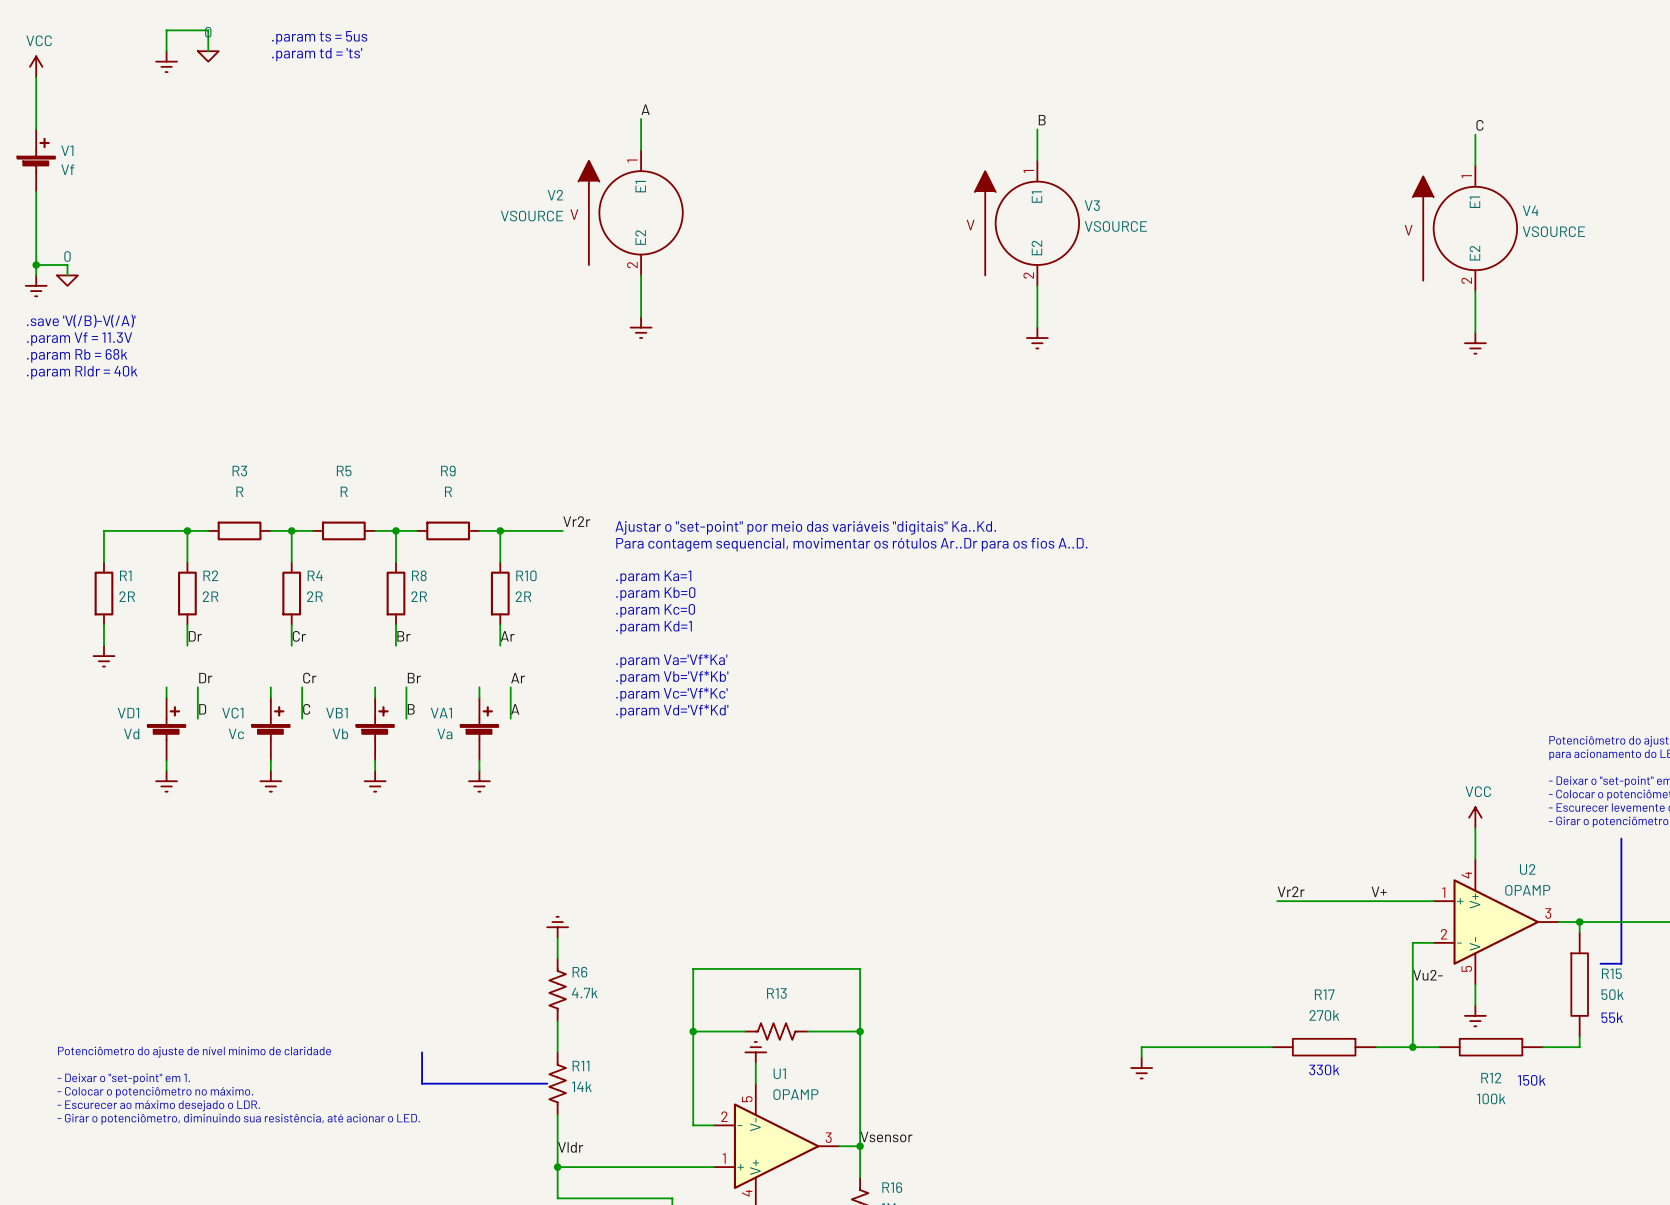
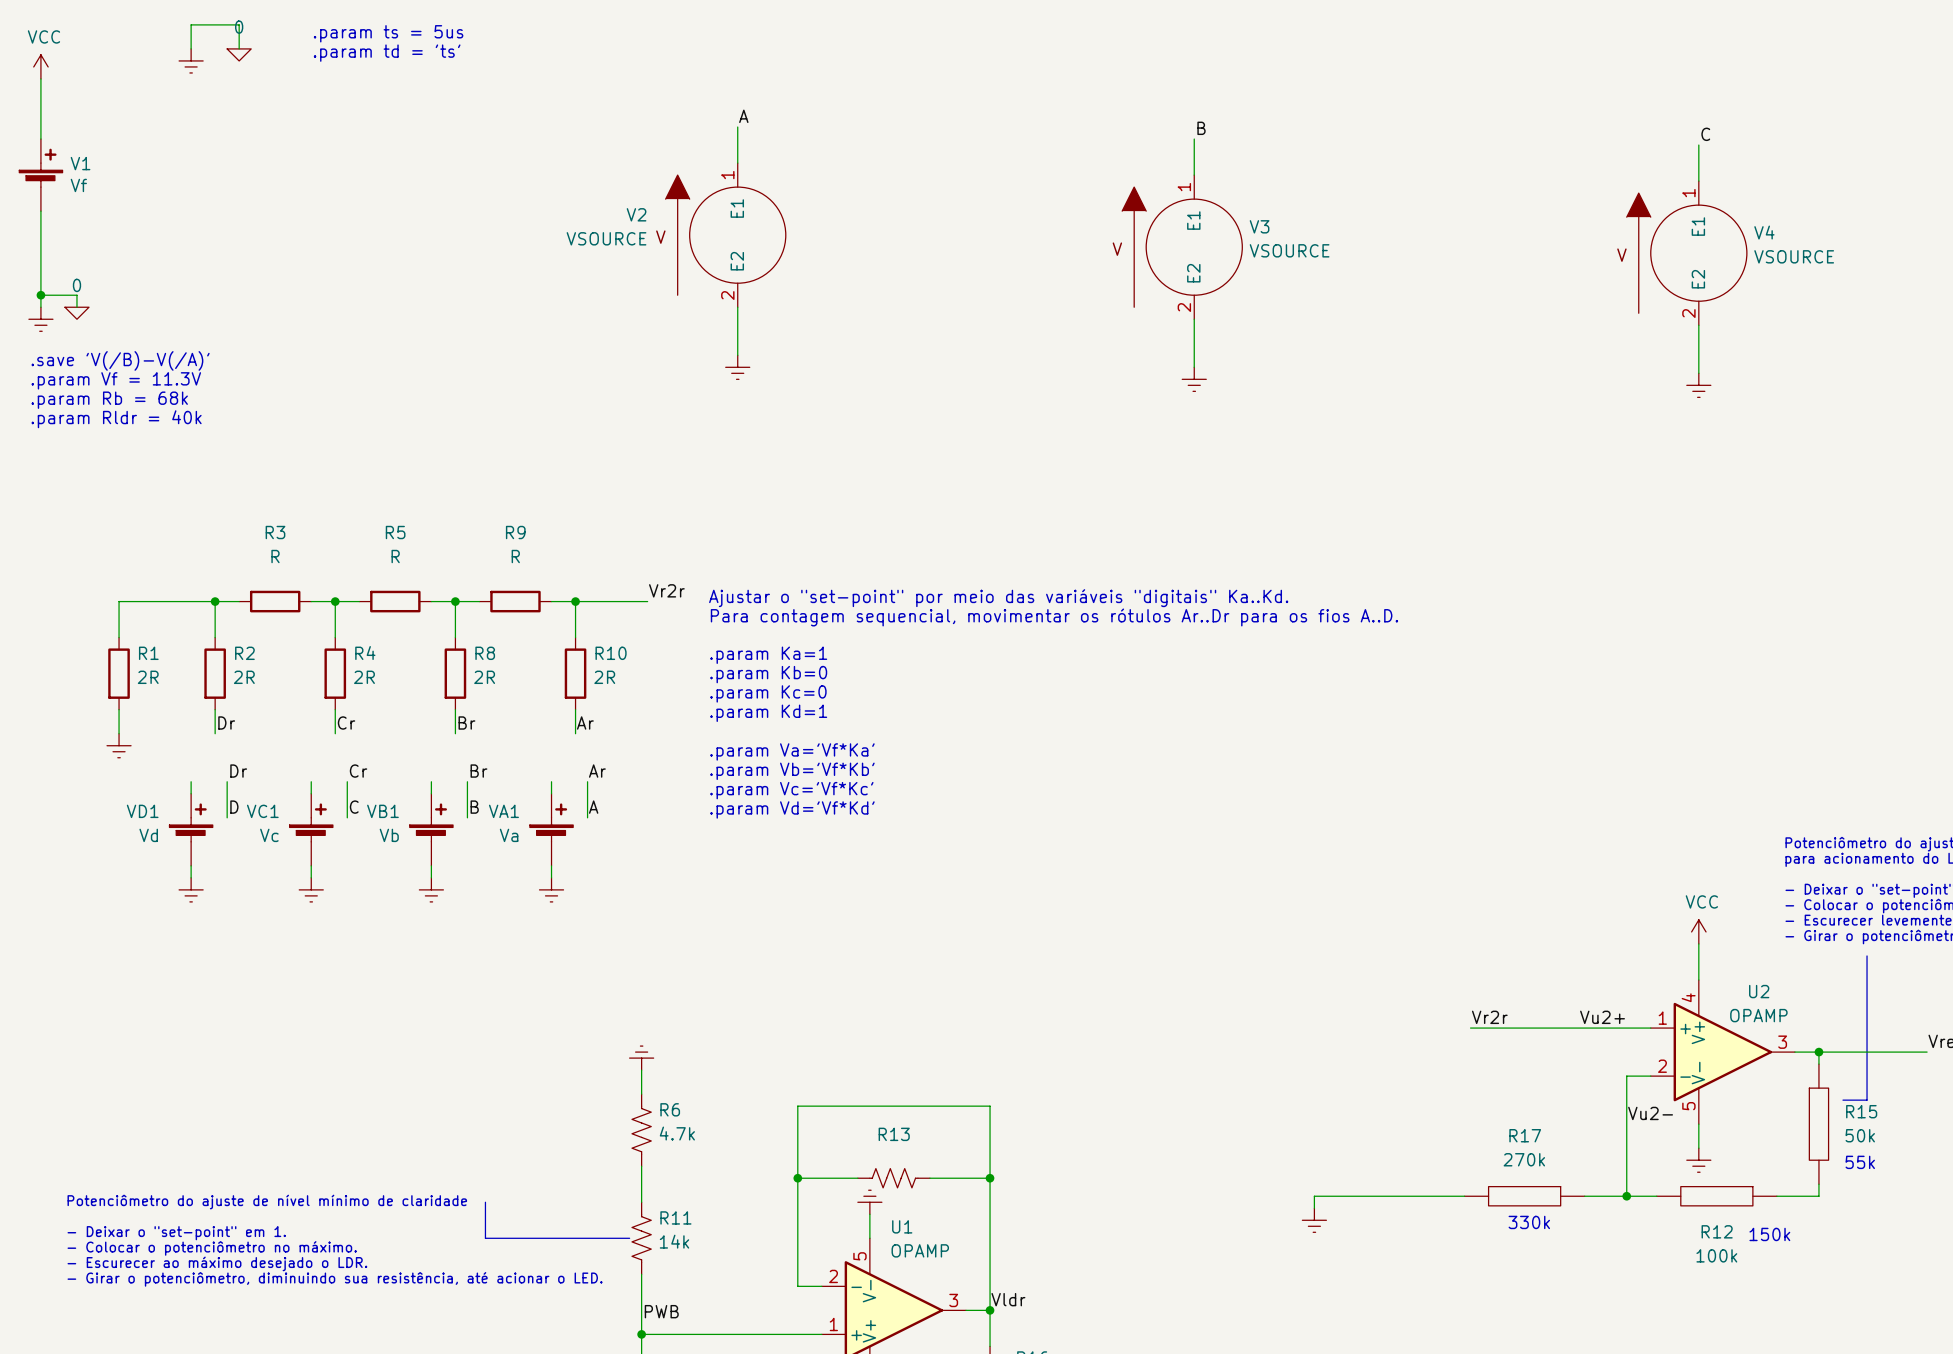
label: V+ (1379, 891) -> Vu2+ (1602, 1017)
label: Vsensor (886, 1137) -> Vldr (1008, 1299)
label: Vldr (570, 1147) -> PWB (661, 1311)

